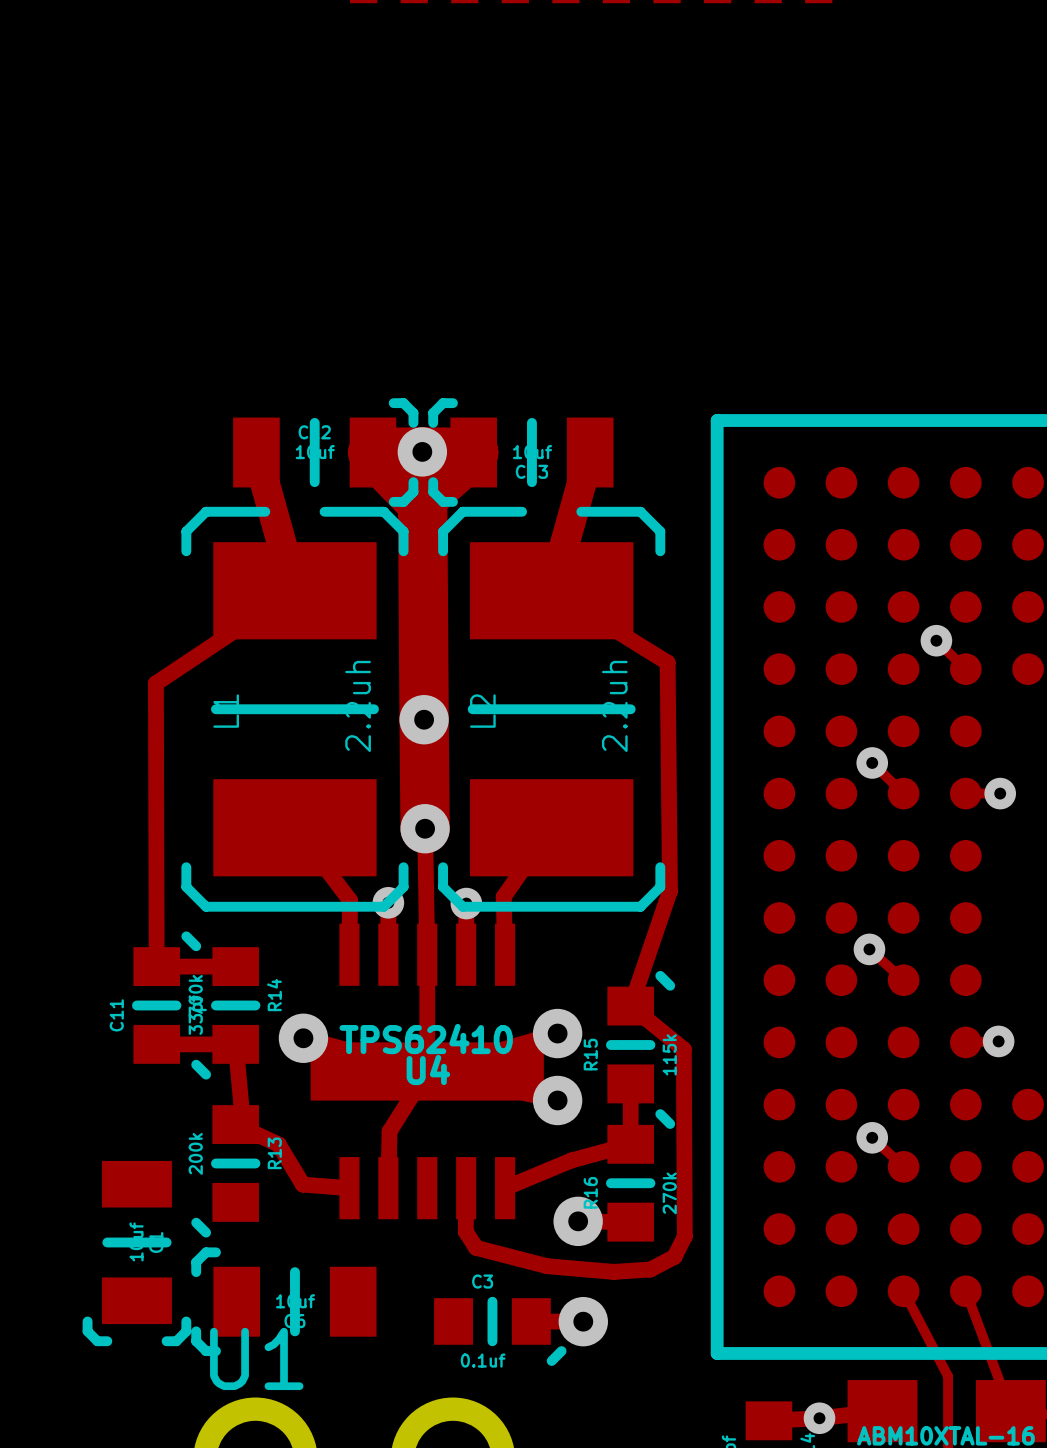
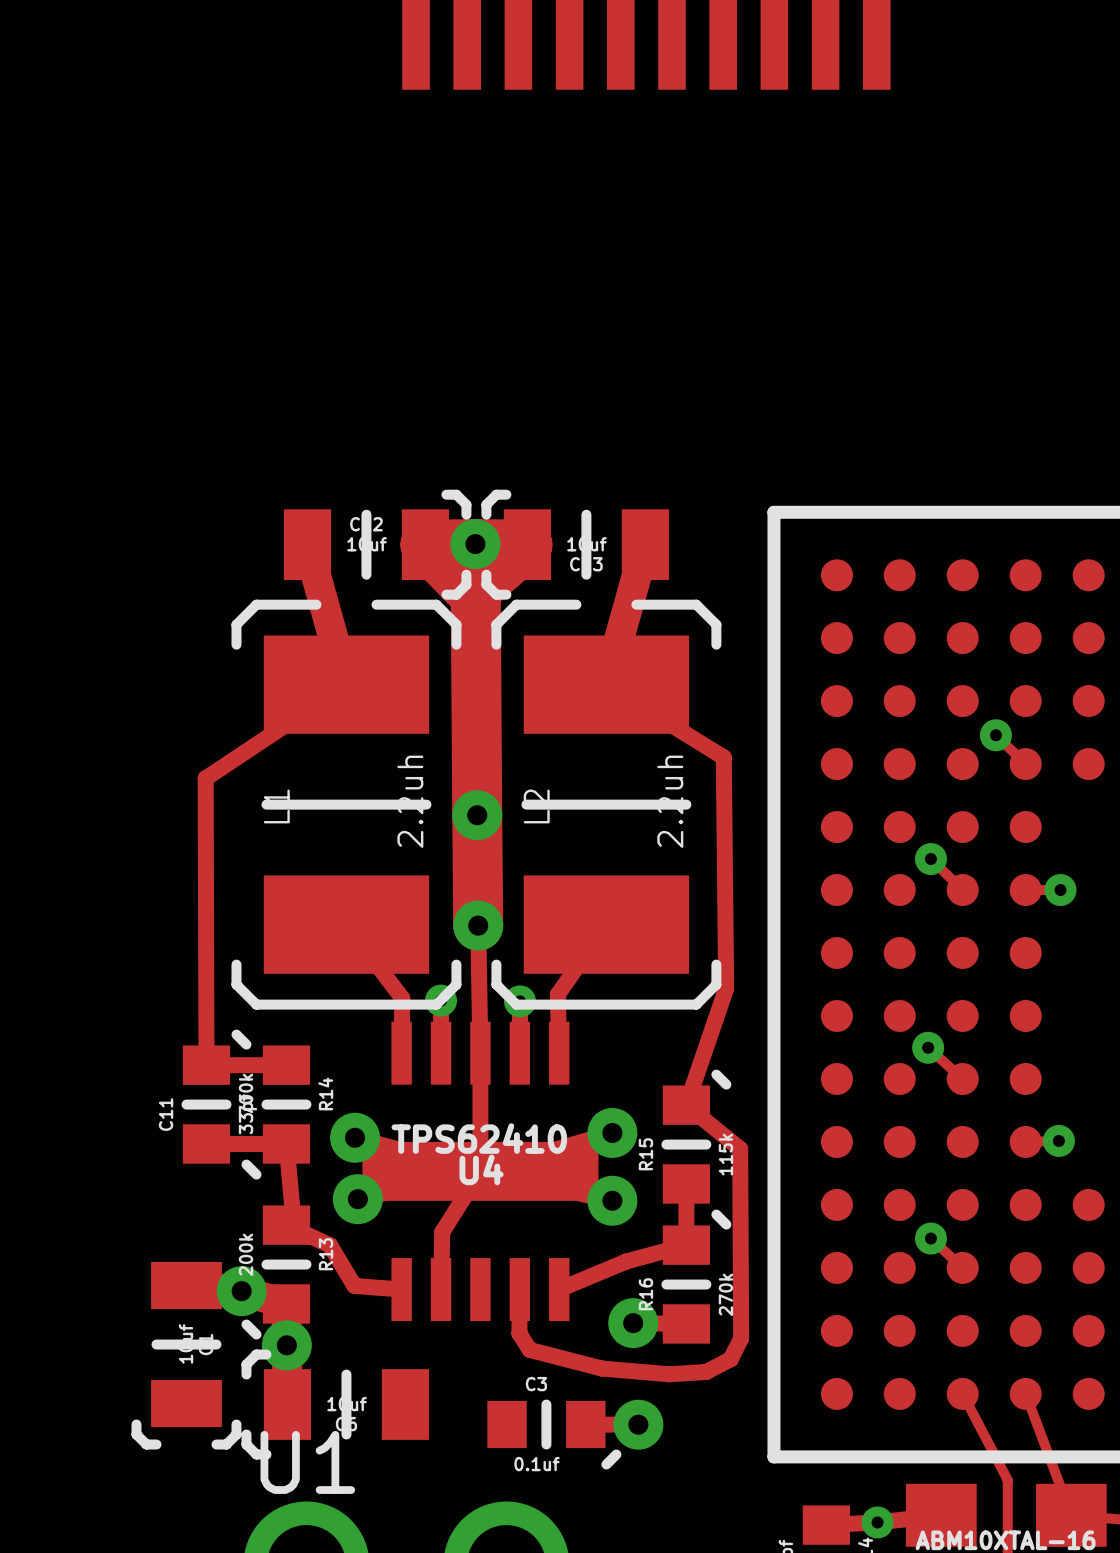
via: none -> (357, 1199)
via: none -> (241, 1291)
via: none -> (286, 1345)

